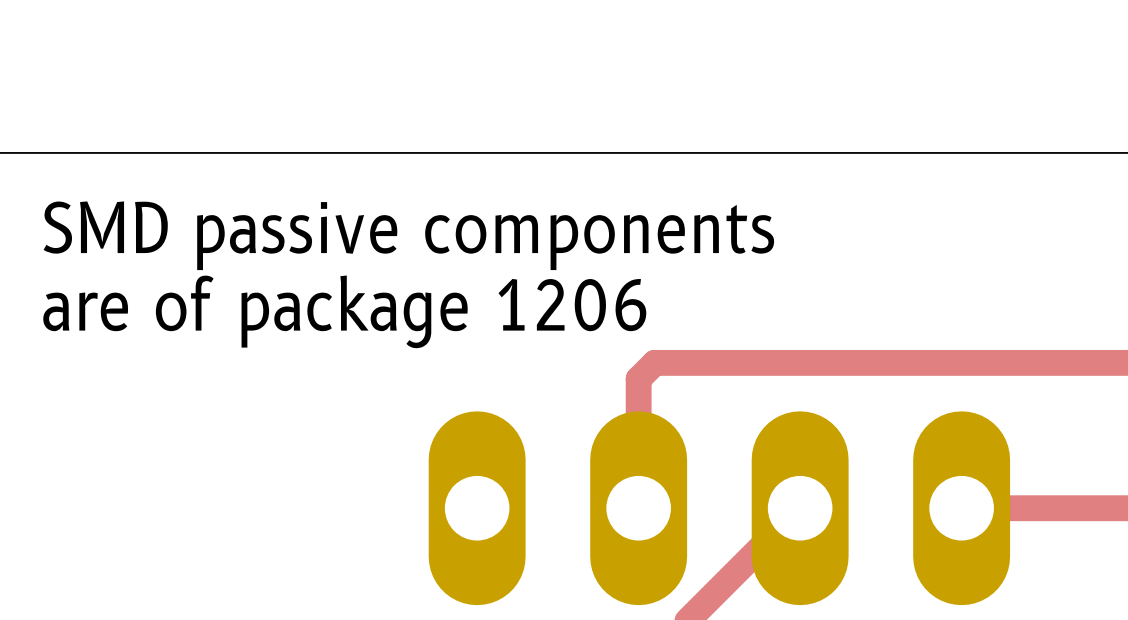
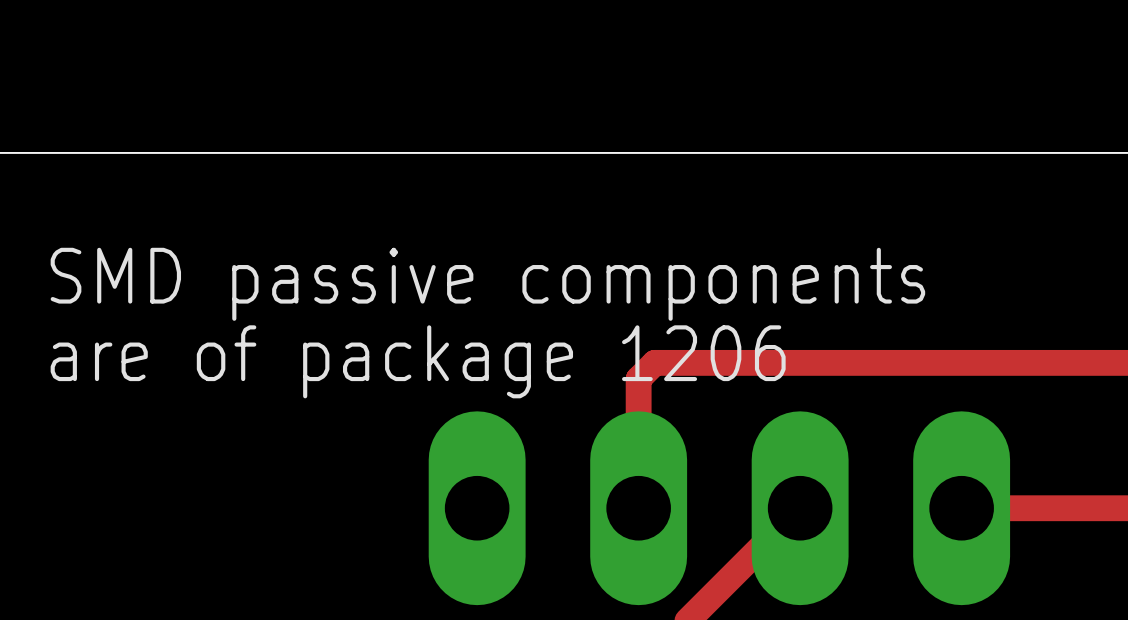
text position: SMD passive components (408, 235) -> SMD passive components (487, 284)
text position: are of package 1206 (344, 311) -> are of package 1206 (418, 361)

